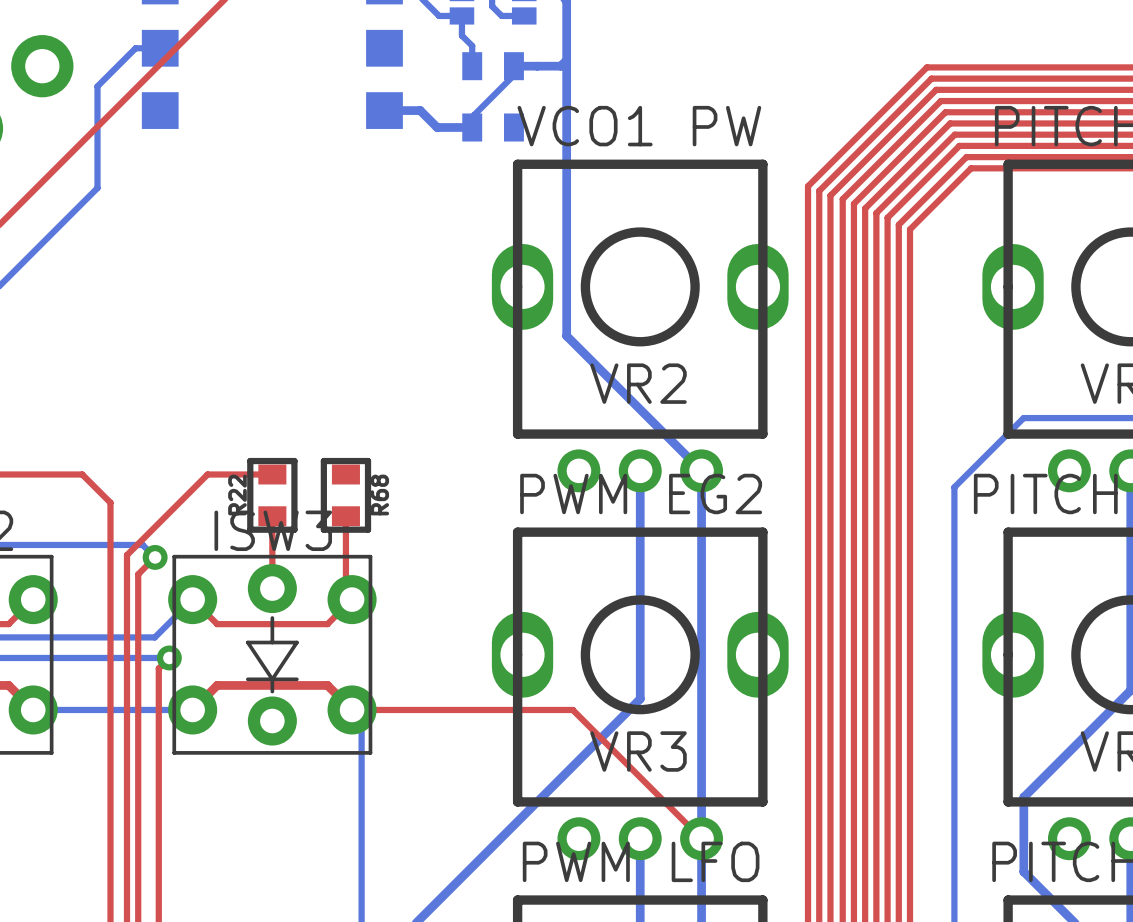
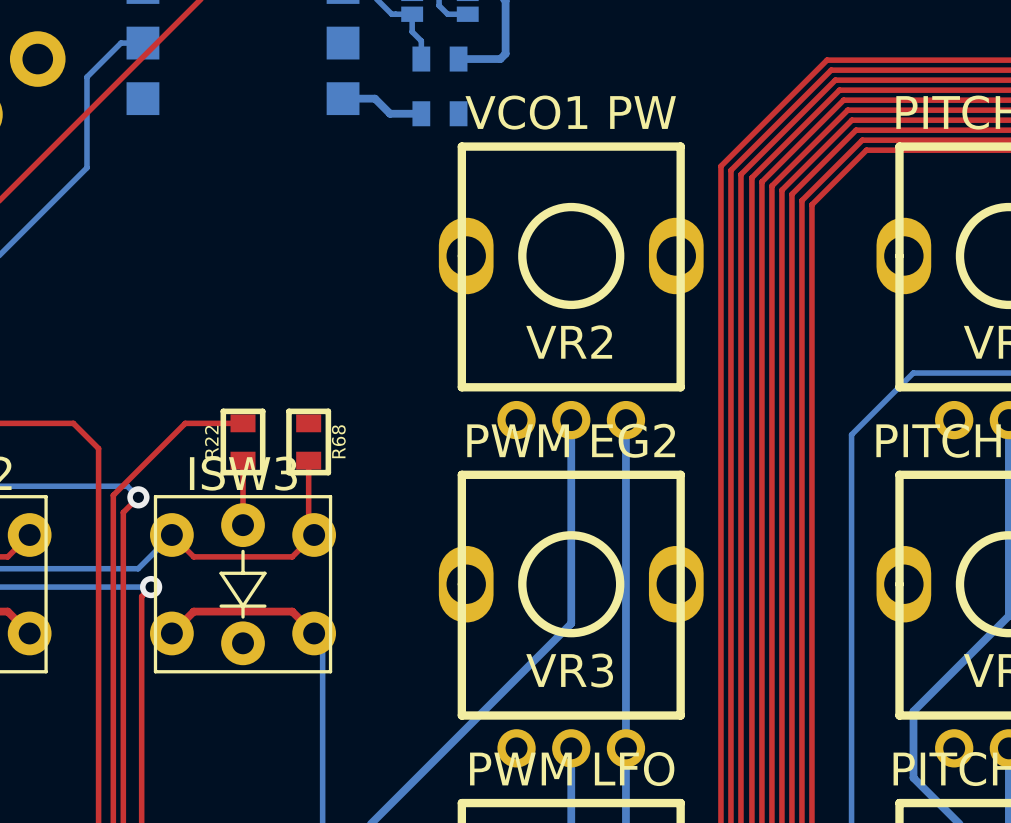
bottom track: (566, 60) (566, 335) (701, 470) -> none
bottom track: (537, 66) (523, 66) (474, 114) (474, 127) (472, 127) -> none
bottom track: (33, 709) (192, 709) -> none
top track: (352, 709) (572, 709) (701, 838) -> none

